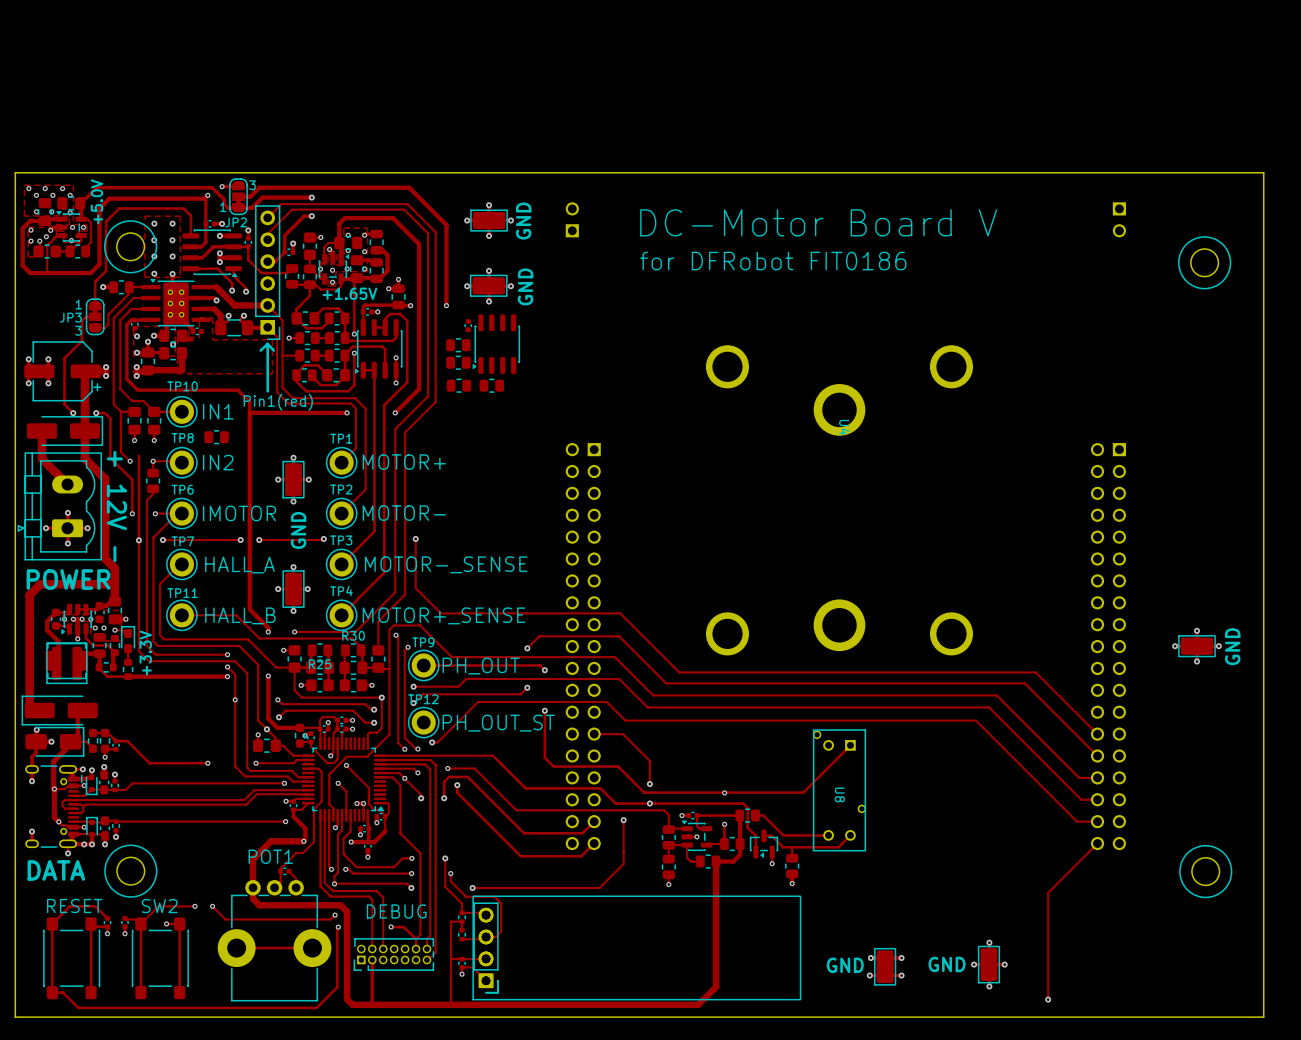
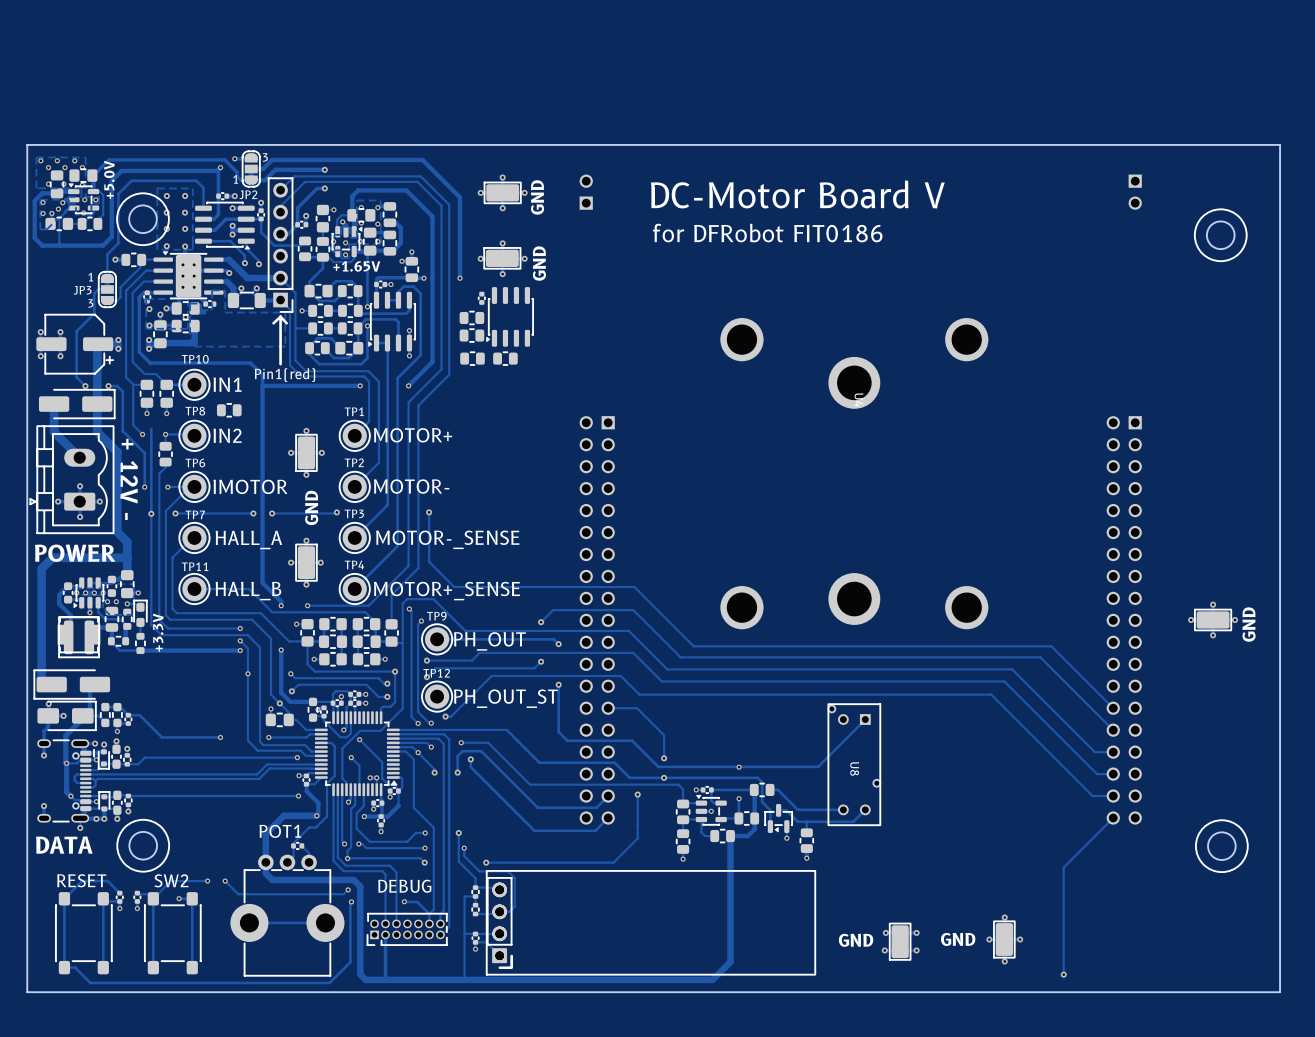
R25: (319, 650) -> none
part: none -> (332, 624)
R30: (353, 650) -> none
part: none -> (366, 624)

